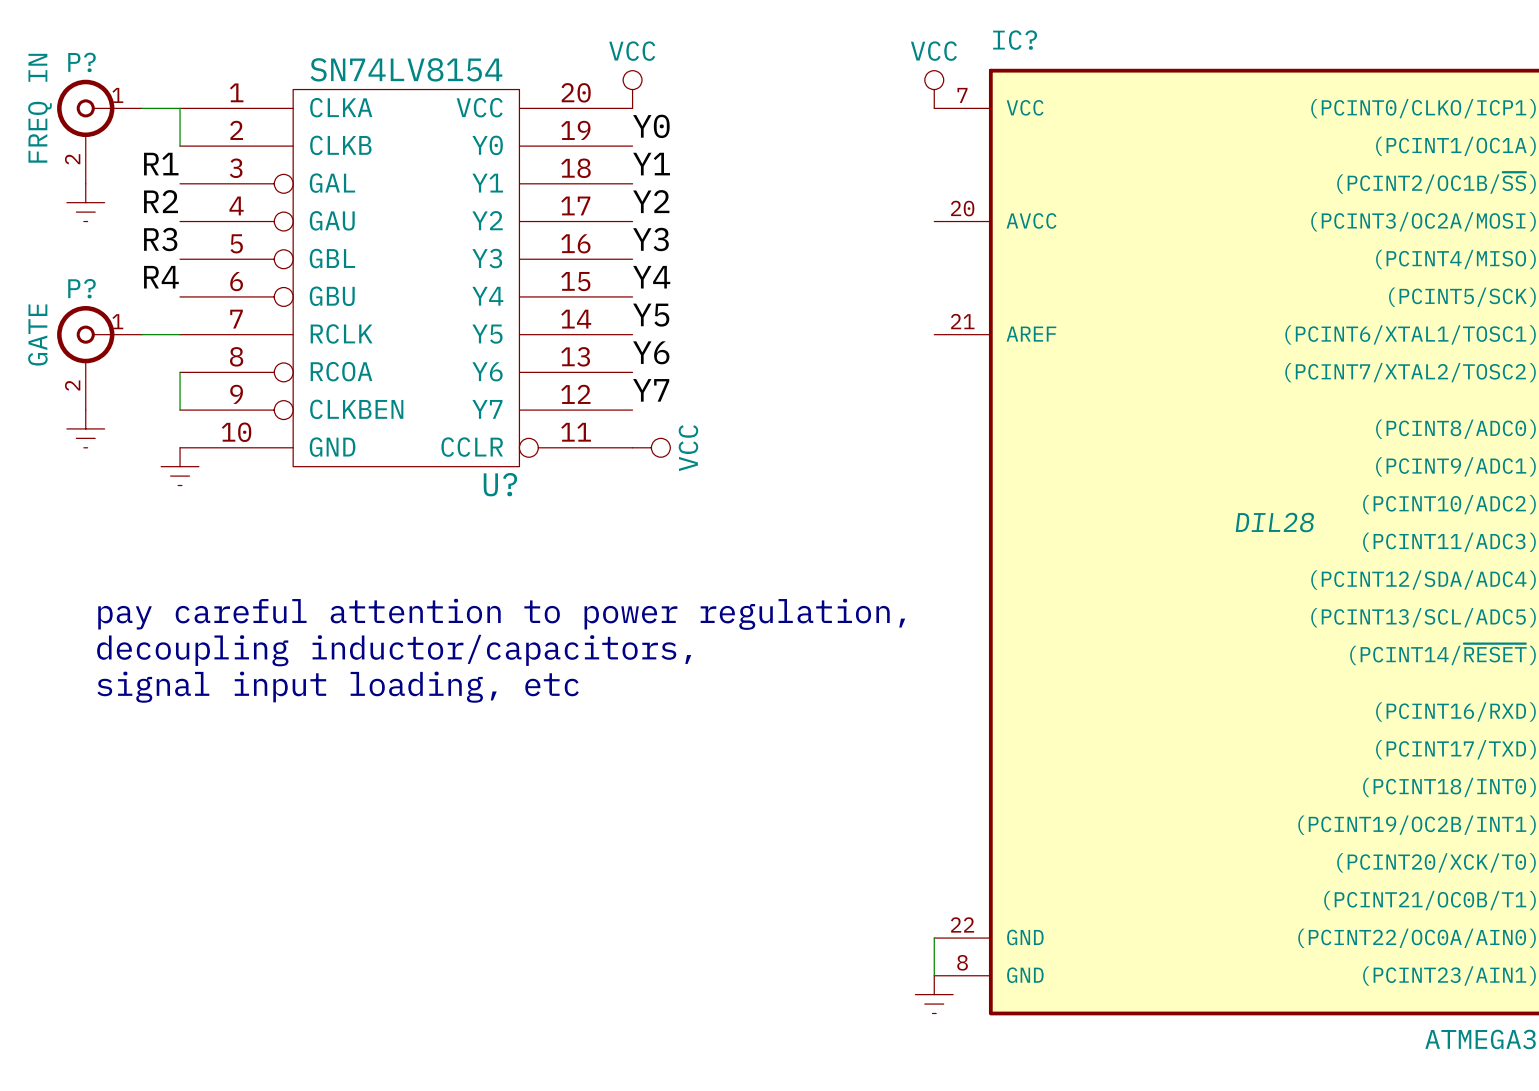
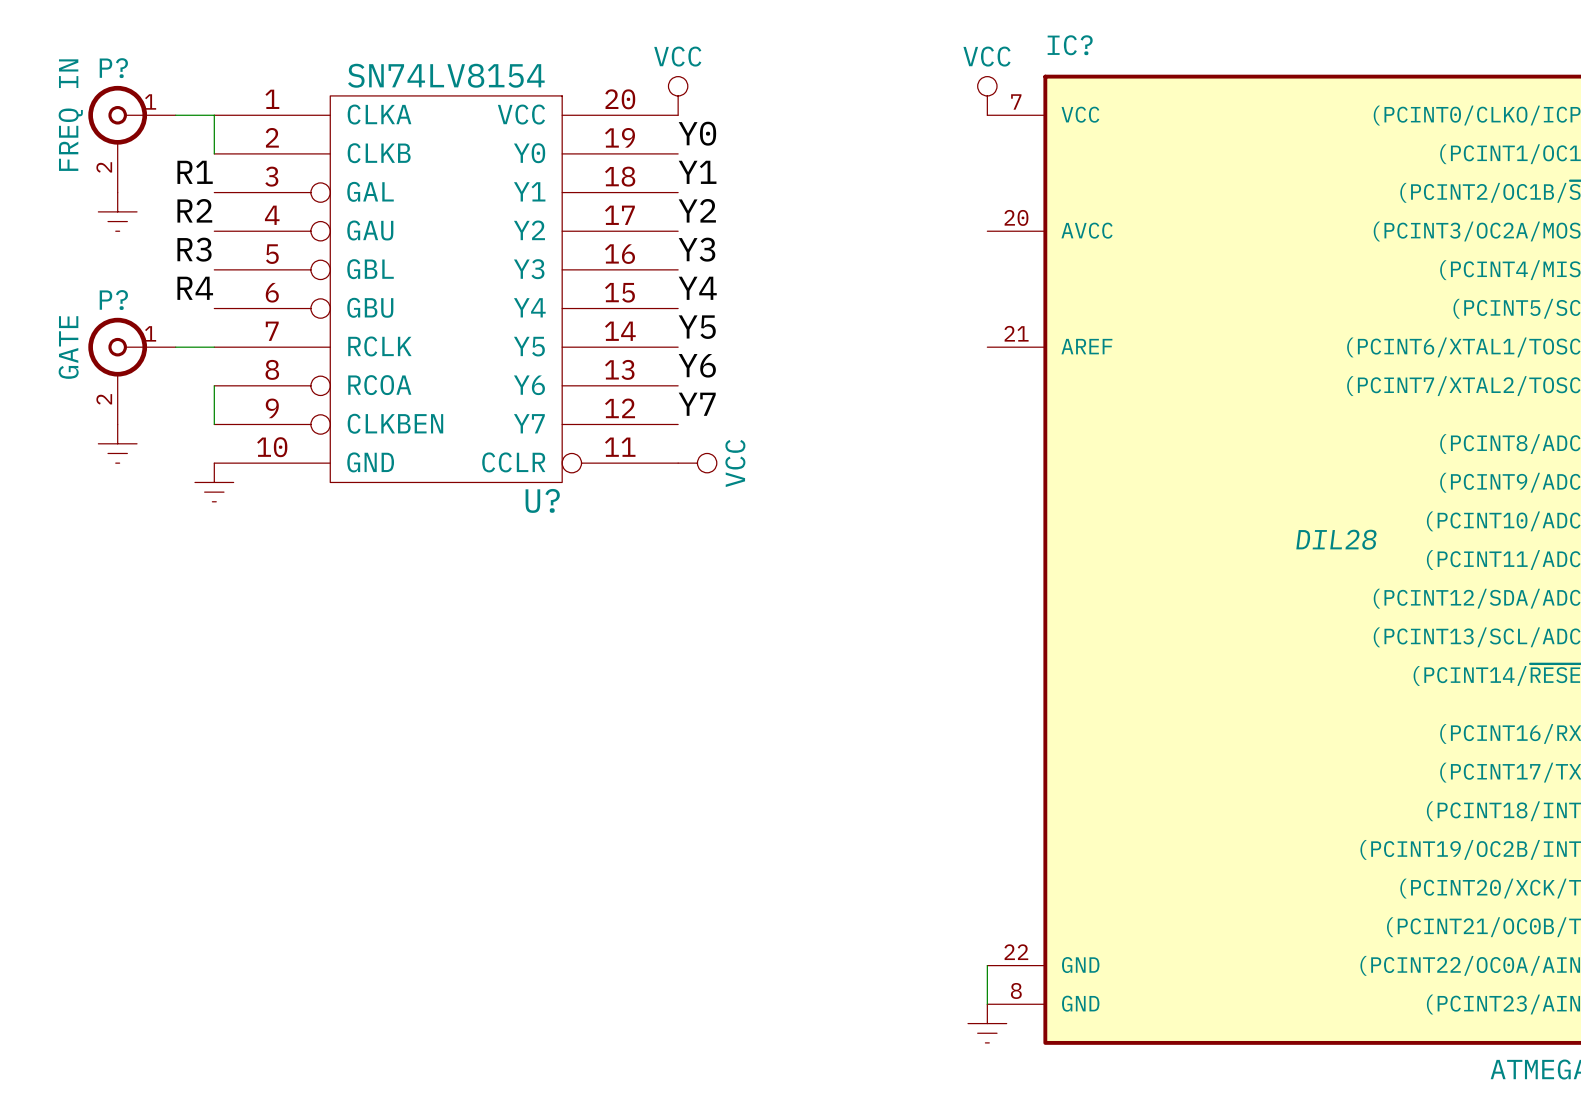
text: pay careful attention to power regulation, (501, 614) -> none
text: decoupling inductor/capacitors, (394, 650) -> none
text: signal input loading, etc (338, 687) -> none

